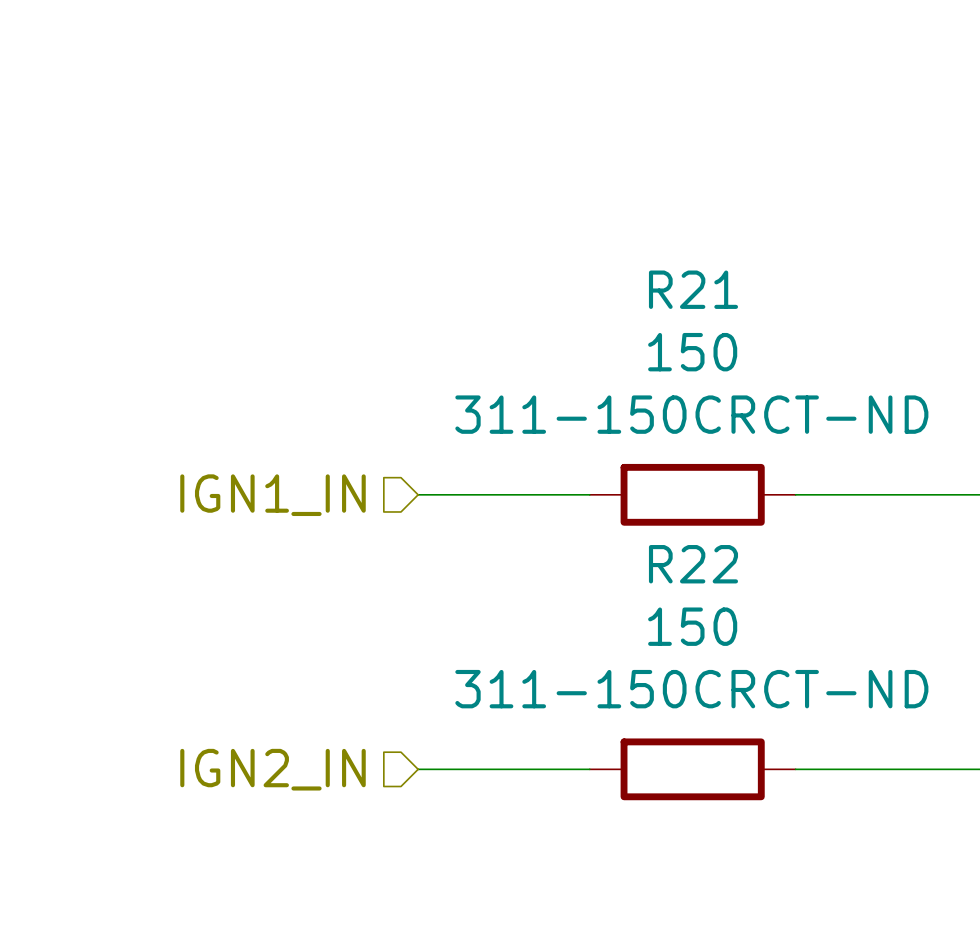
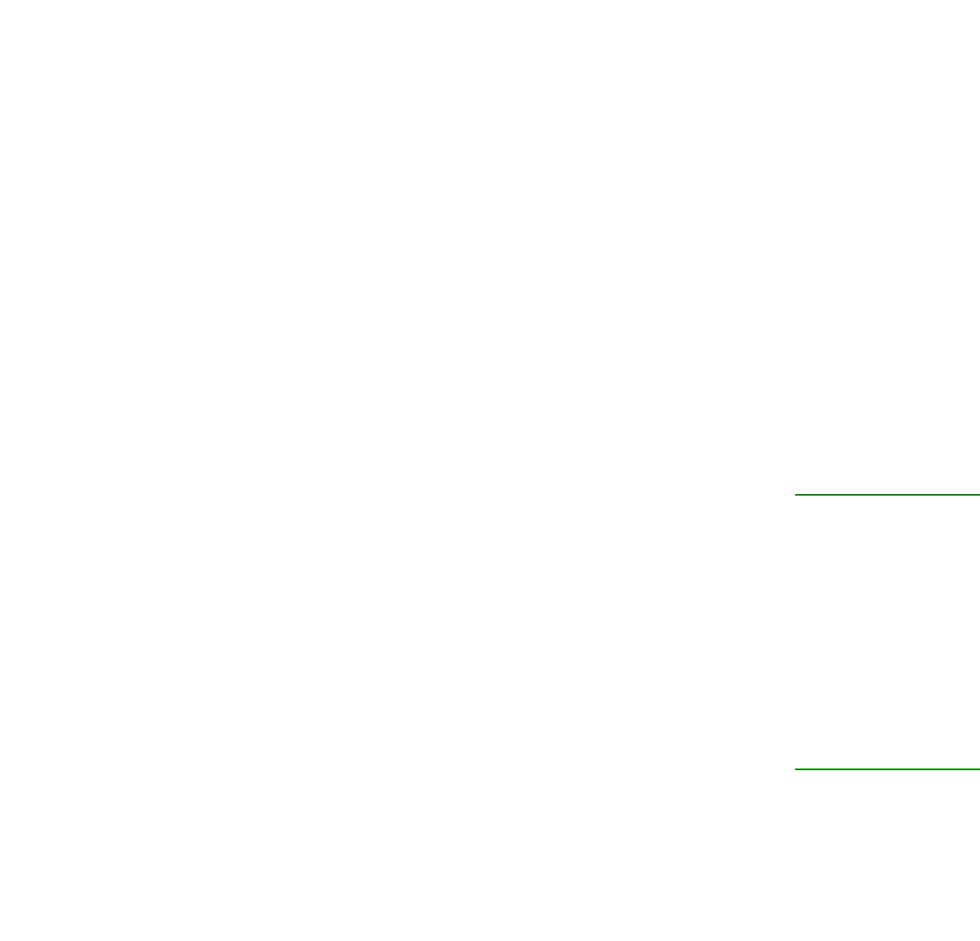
wire: (418, 494) (589, 494) -> none
R21: 150 (692, 494) -> none
hierarchical label: IGN1_IN (273, 495) -> none
hierarchical label: IGN2_IN (273, 769) -> none
wire: (418, 769) (589, 769) -> none
R22: 150 (692, 769) -> none

